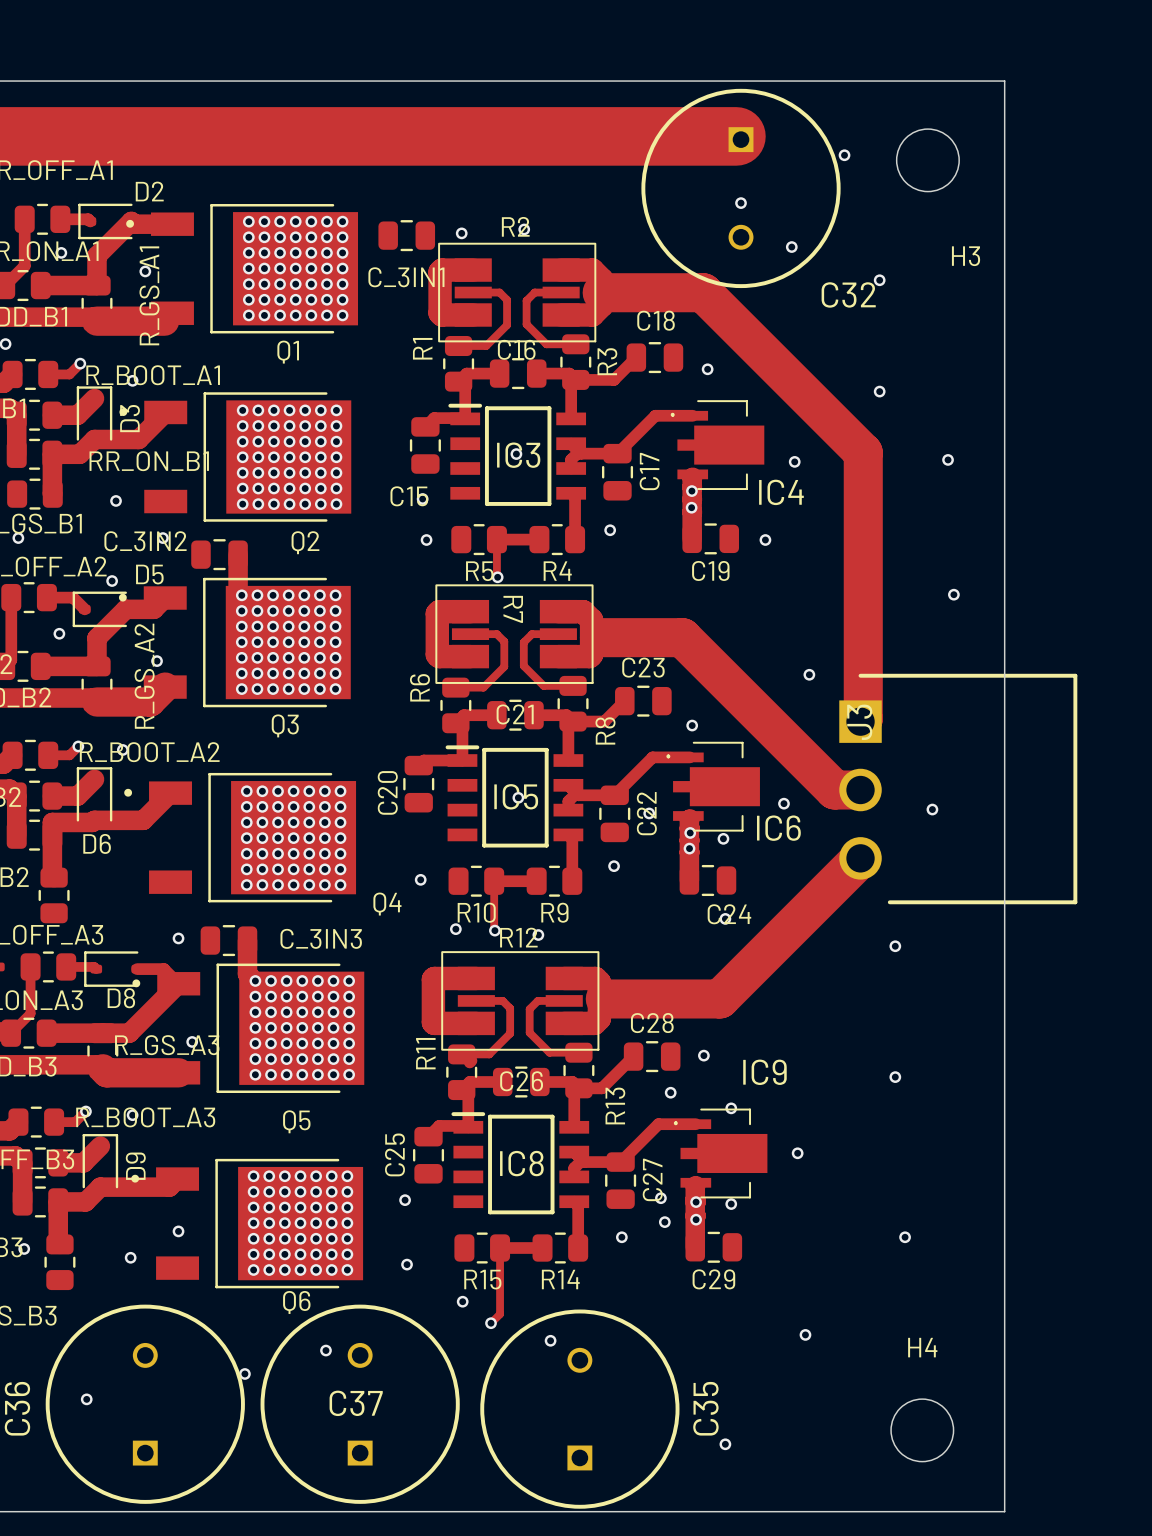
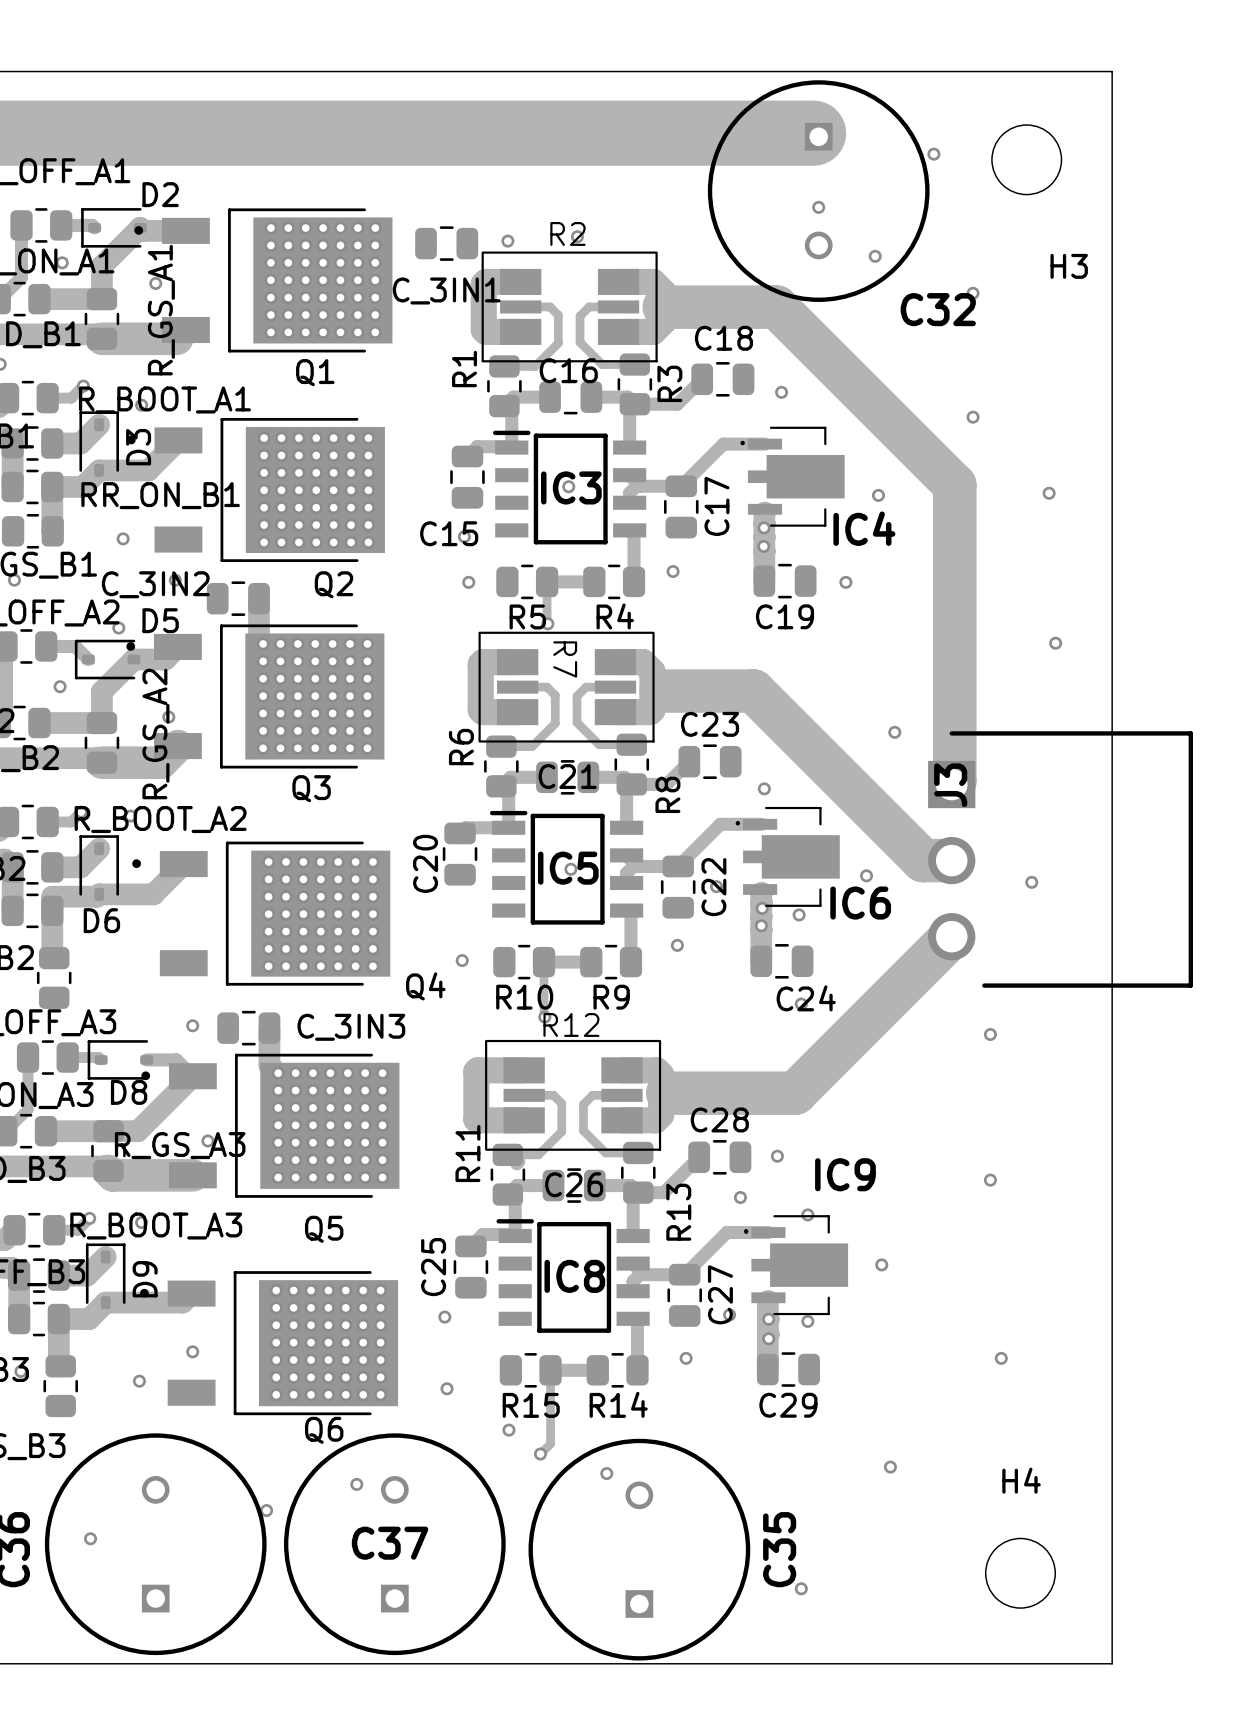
via: (455, 929) -> none
via: (538, 935) -> none
via: (664, 1222) -> none

